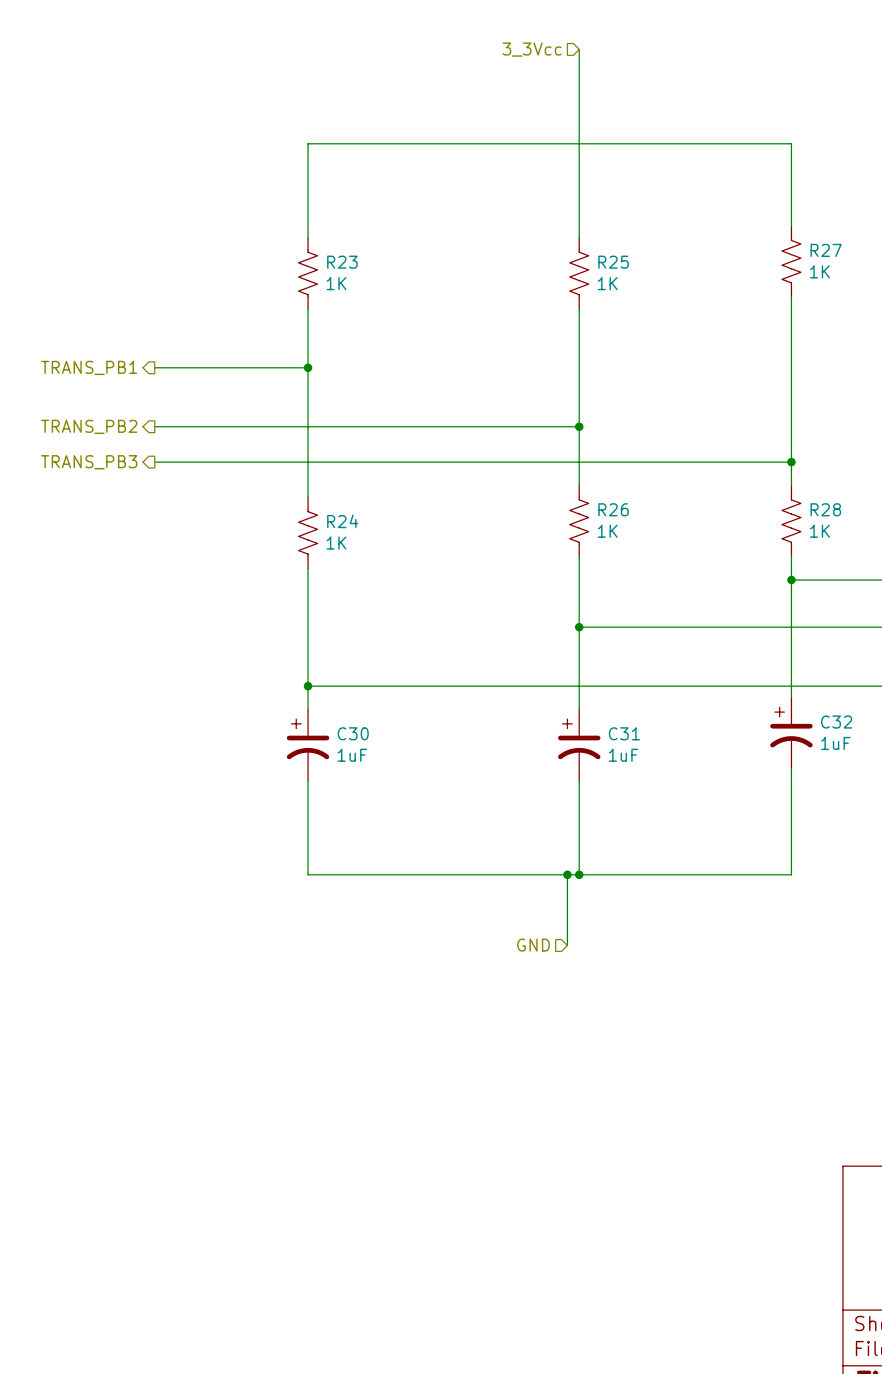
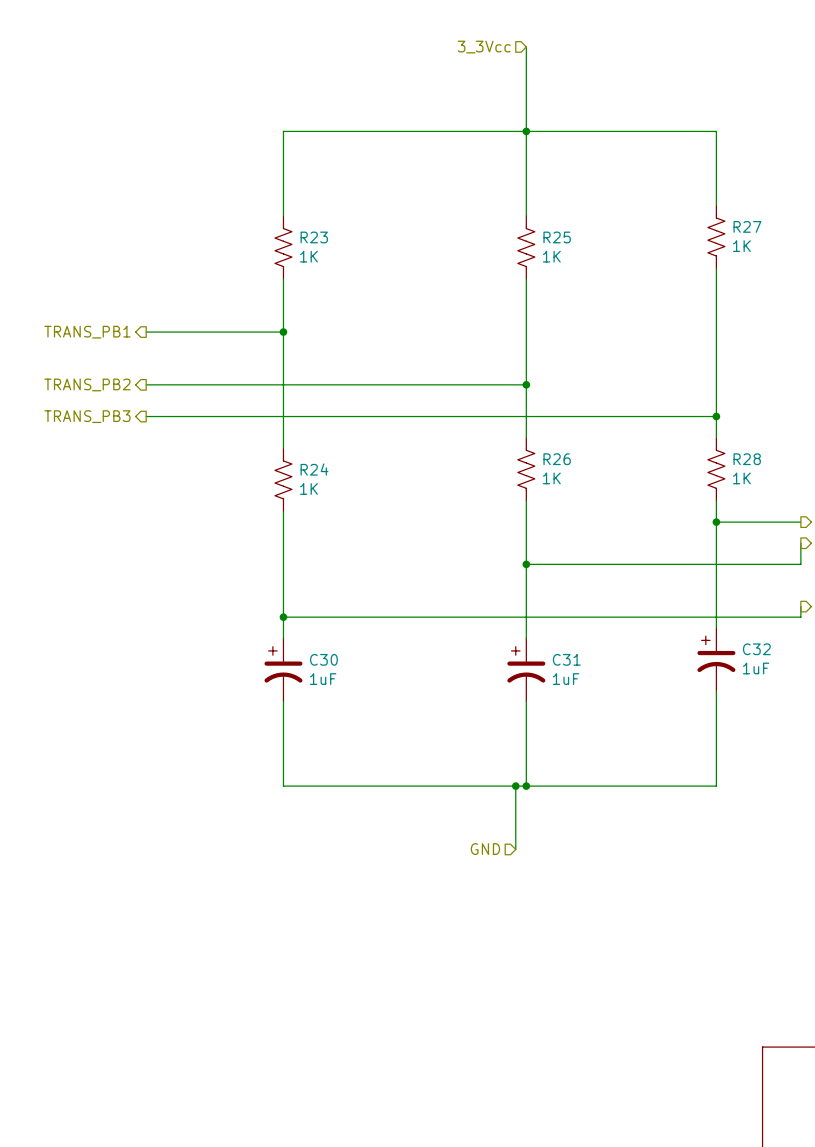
junction: none -> (526, 131)

